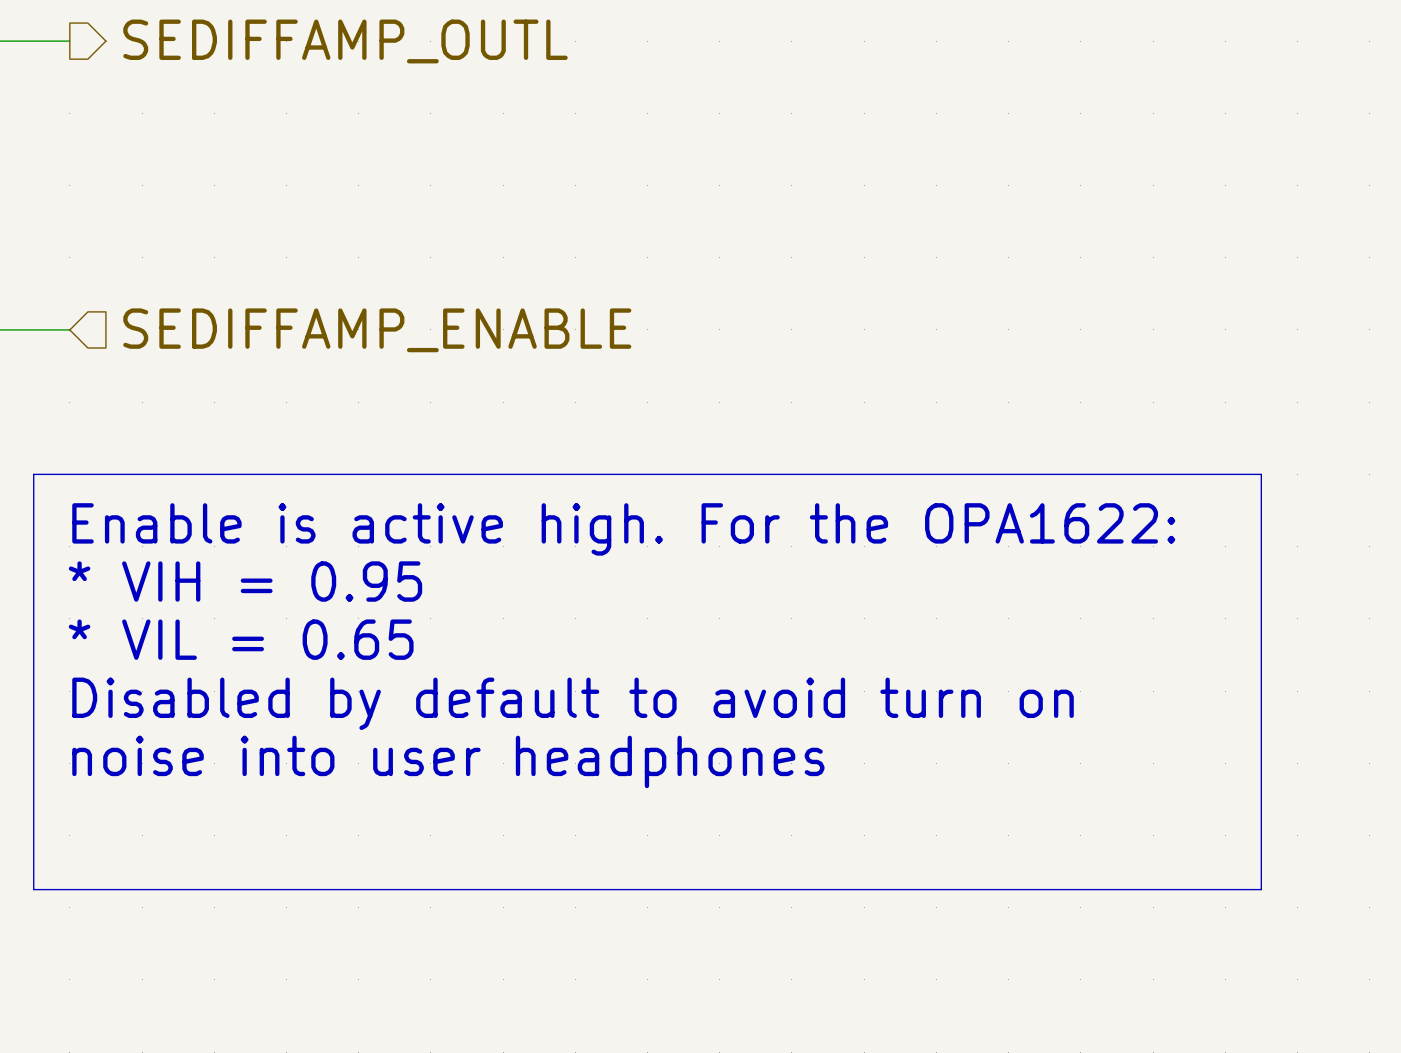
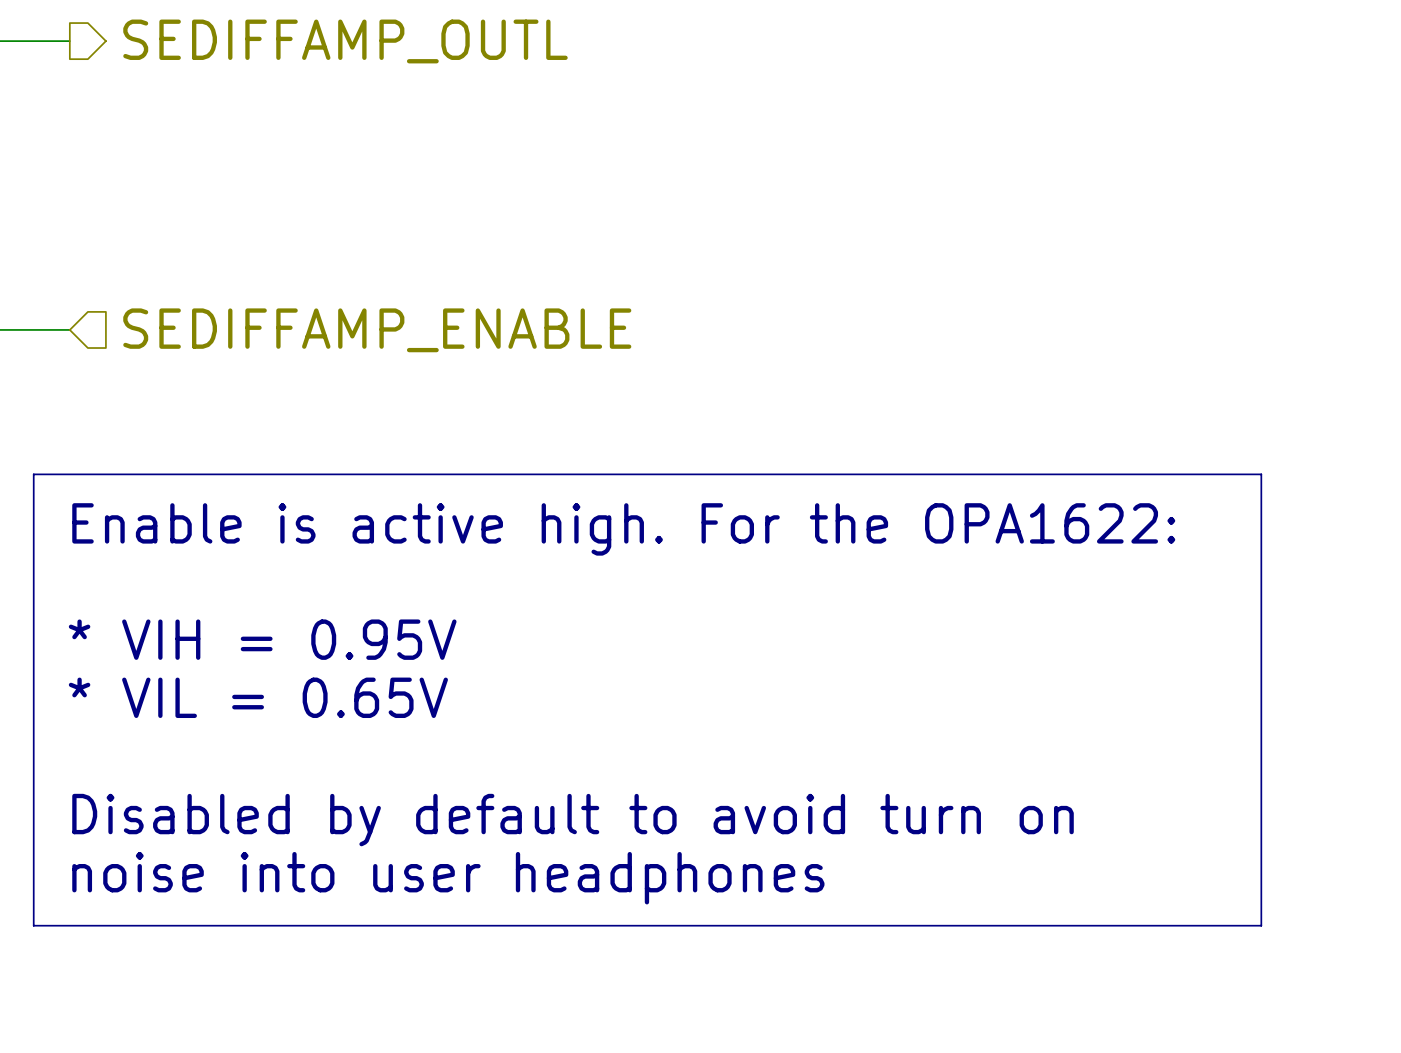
text: * VIH = 0.95 (245, 581) -> none
text: * VIL = 0.65 (241, 639) -> * VIH = 0.95V (262, 639)
text: Disabled by default to avoid turn on (573, 703) -> * VIL = 0.65V (258, 697)
text position: noise into user headphones (448, 761) -> noise into user headphones (448, 878)
text: none -> Disabled by default to avoid turn on (573, 820)
line: (33, 889) (1261, 889) -> (33, 889) (33, 925) (1261, 925) (1261, 889)

